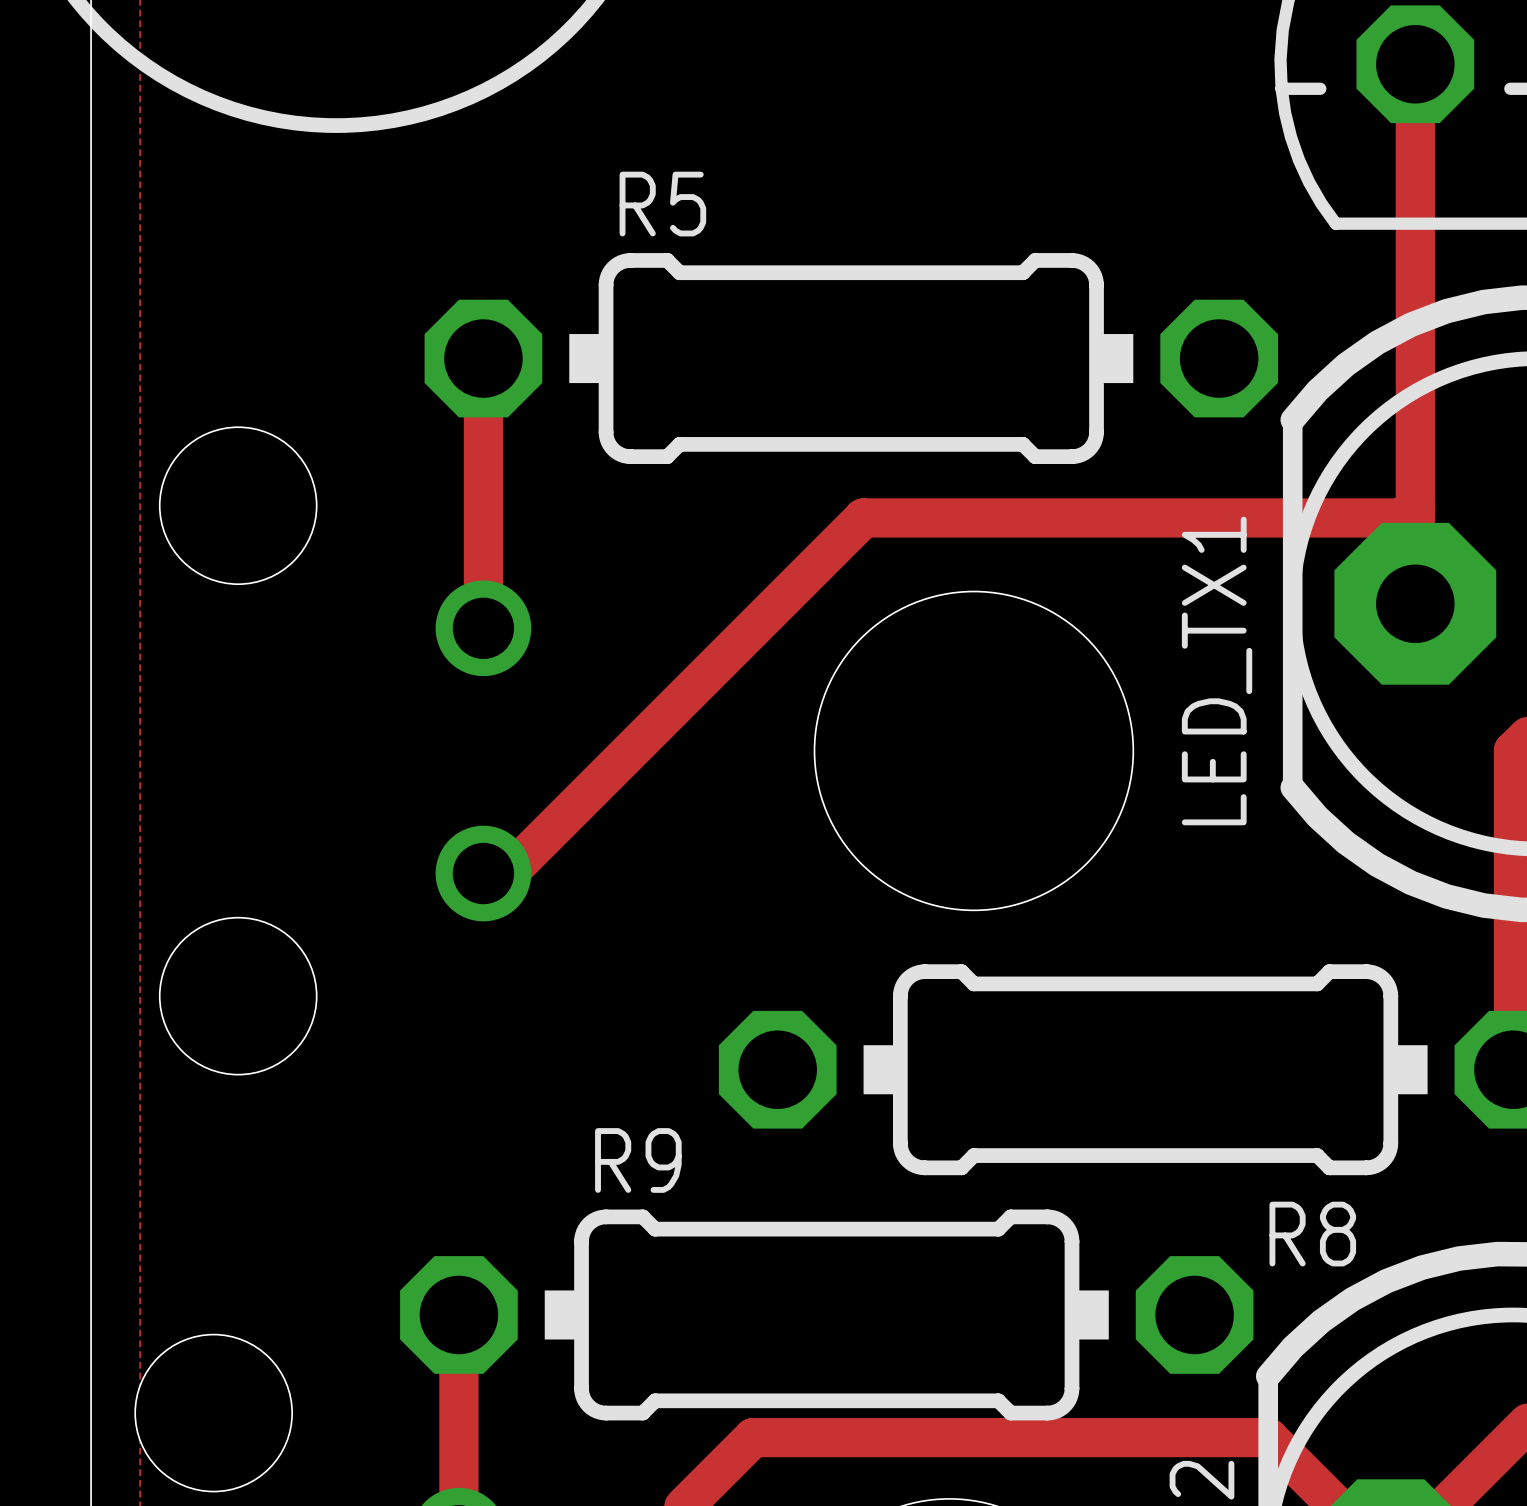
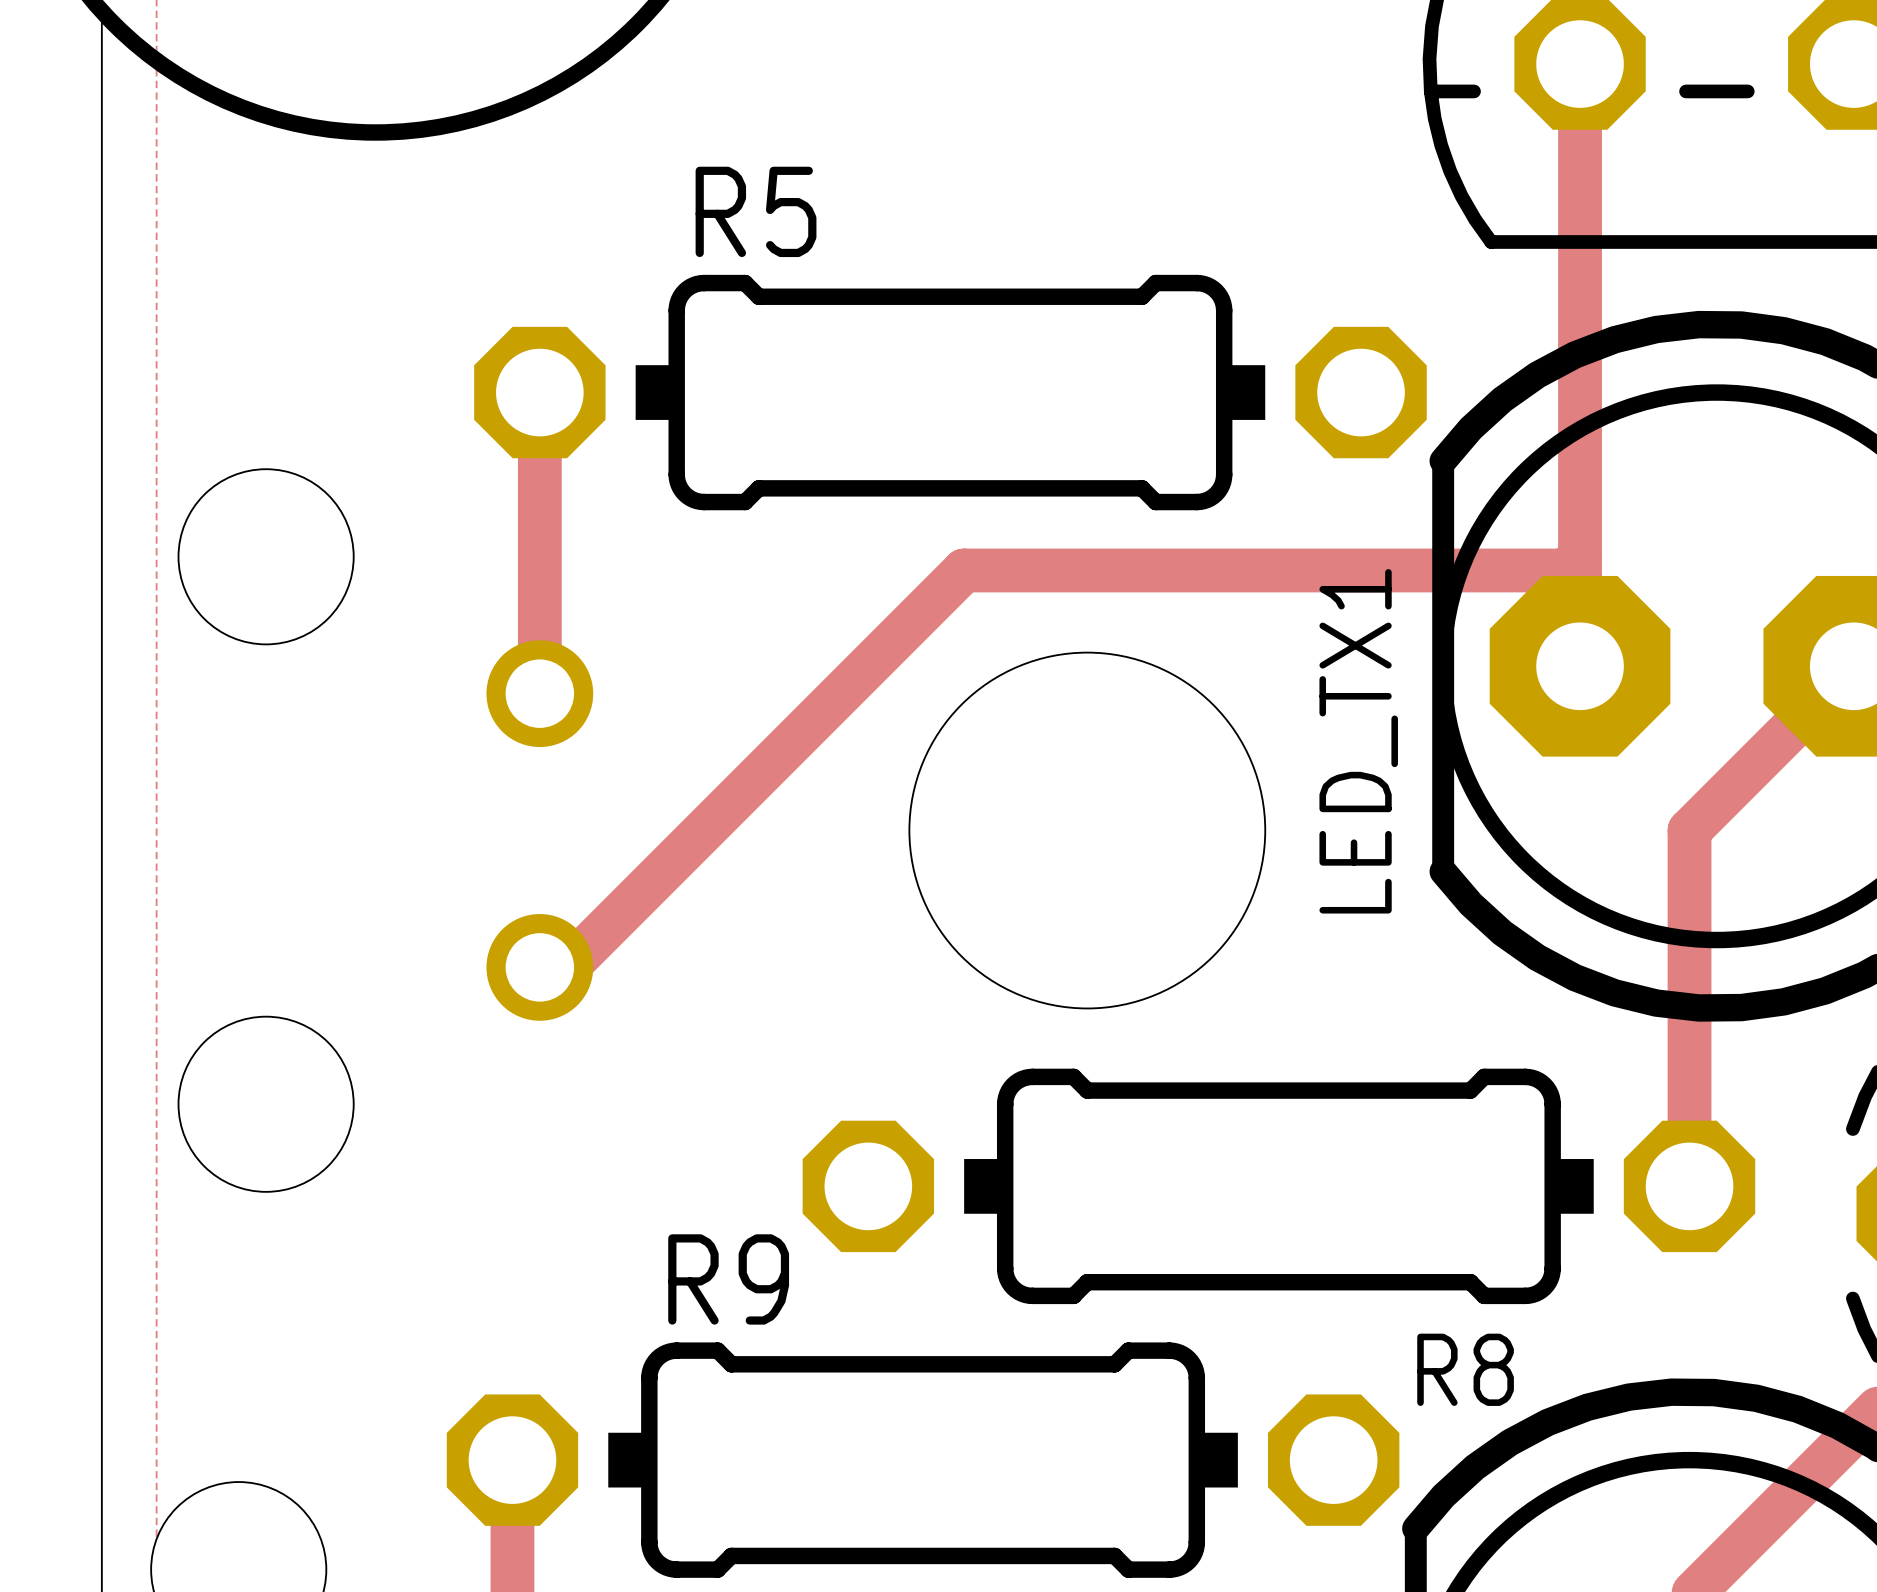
R5 name position: R5 (662, 204) -> R5 (756, 211)
R9 name position: R9 (638, 1160) -> R9 (728, 1279)

